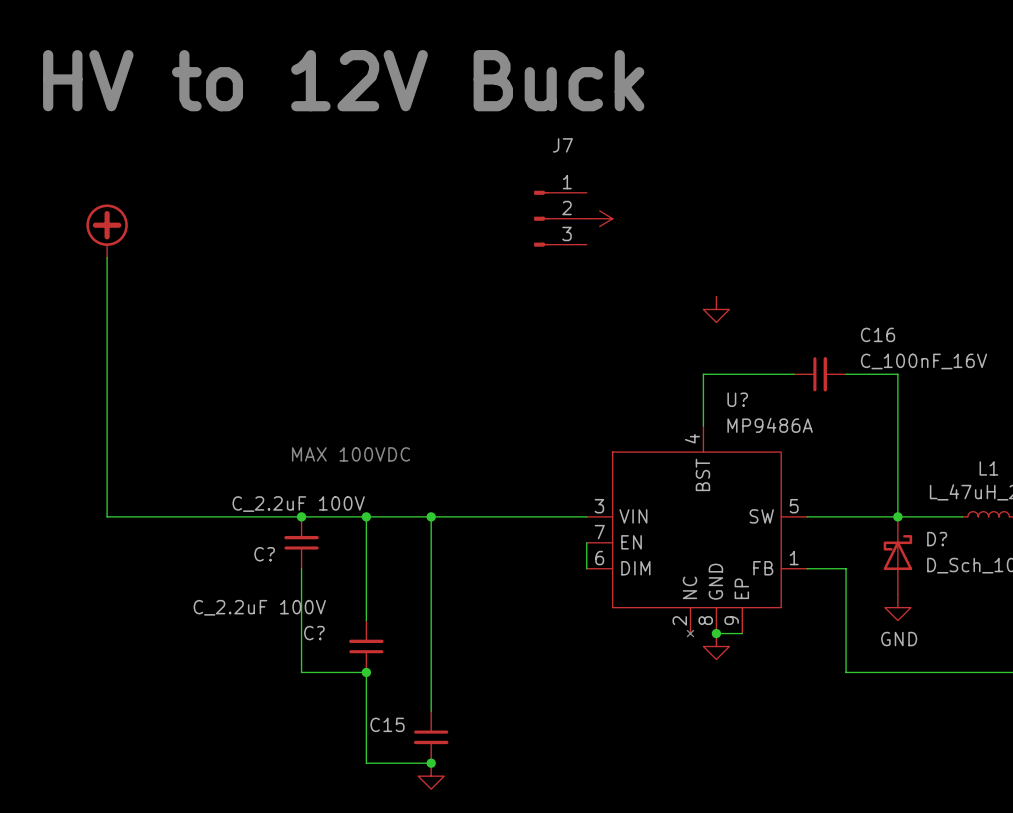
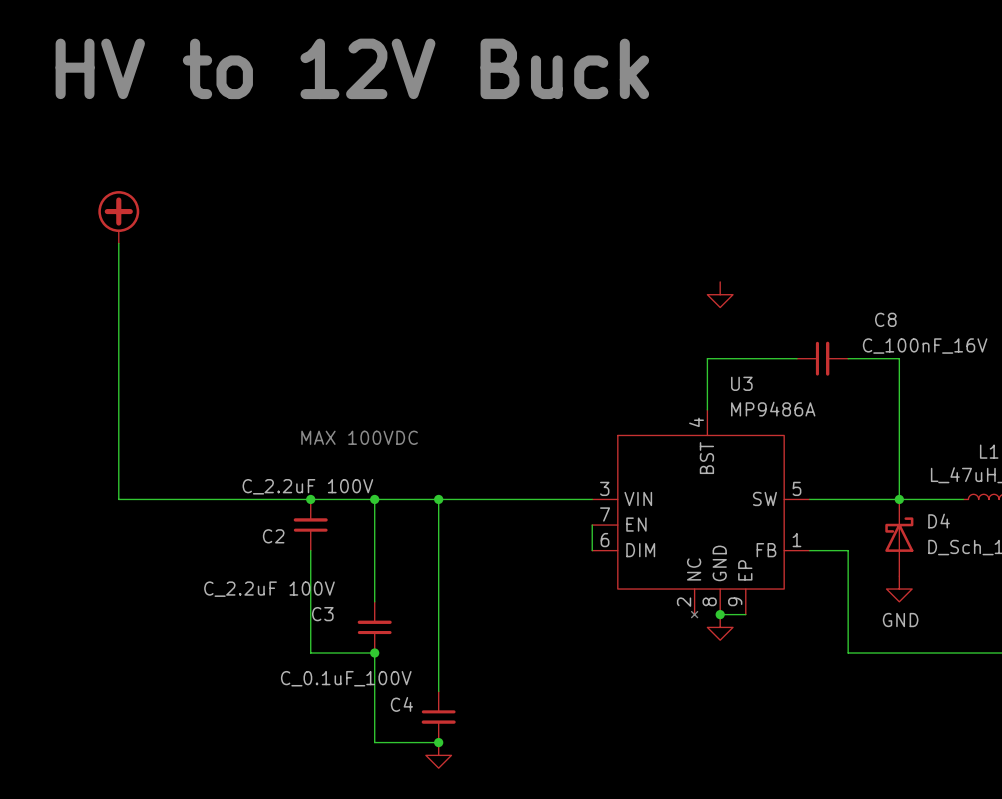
J7: (560, 218) -> none
power symbol: (599, 218) -> none
C16 name: C16 (878, 334) -> C8 (885, 319)
U? name: U? (737, 399) -> U3 (741, 383)
D? name: D? (937, 539) -> D4 (939, 521)
C? name: C? (264, 554) -> C2 (273, 536)
C? name: C? (314, 633) -> C3 (322, 614)
C15 value: none -> C_0.1uF_100V (346, 678)
C15 name: C15 (387, 724) -> C4 (401, 704)

